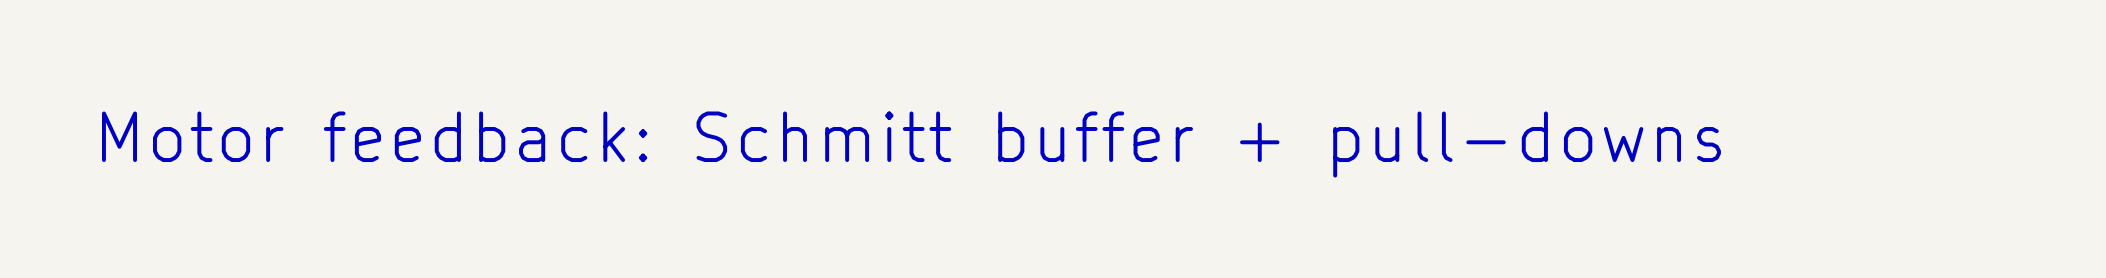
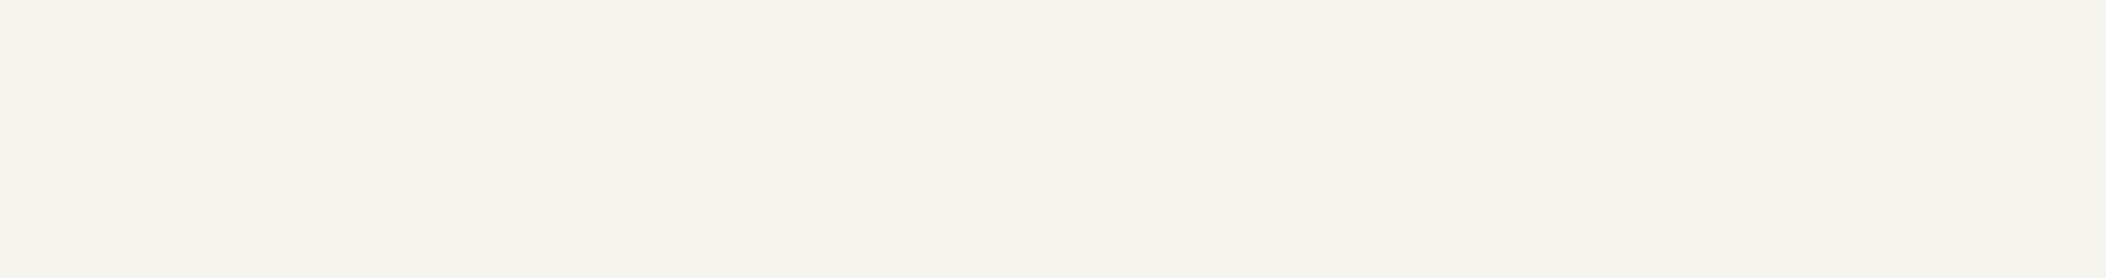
text: Motor feedback: Schmitt buffer + pull-downs (911, 144) -> none

